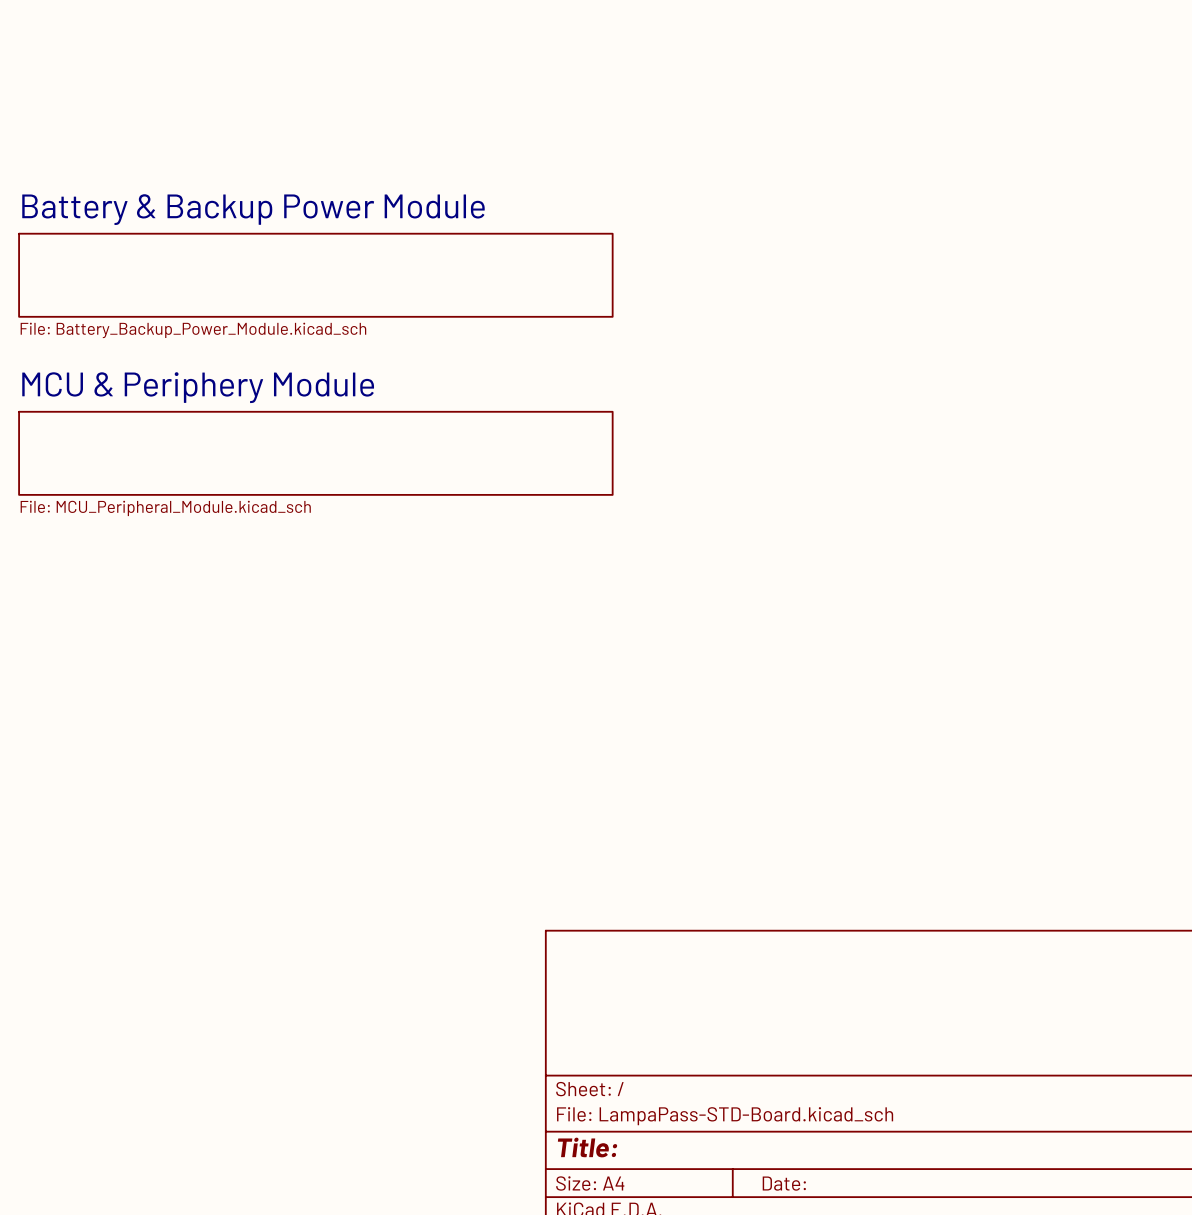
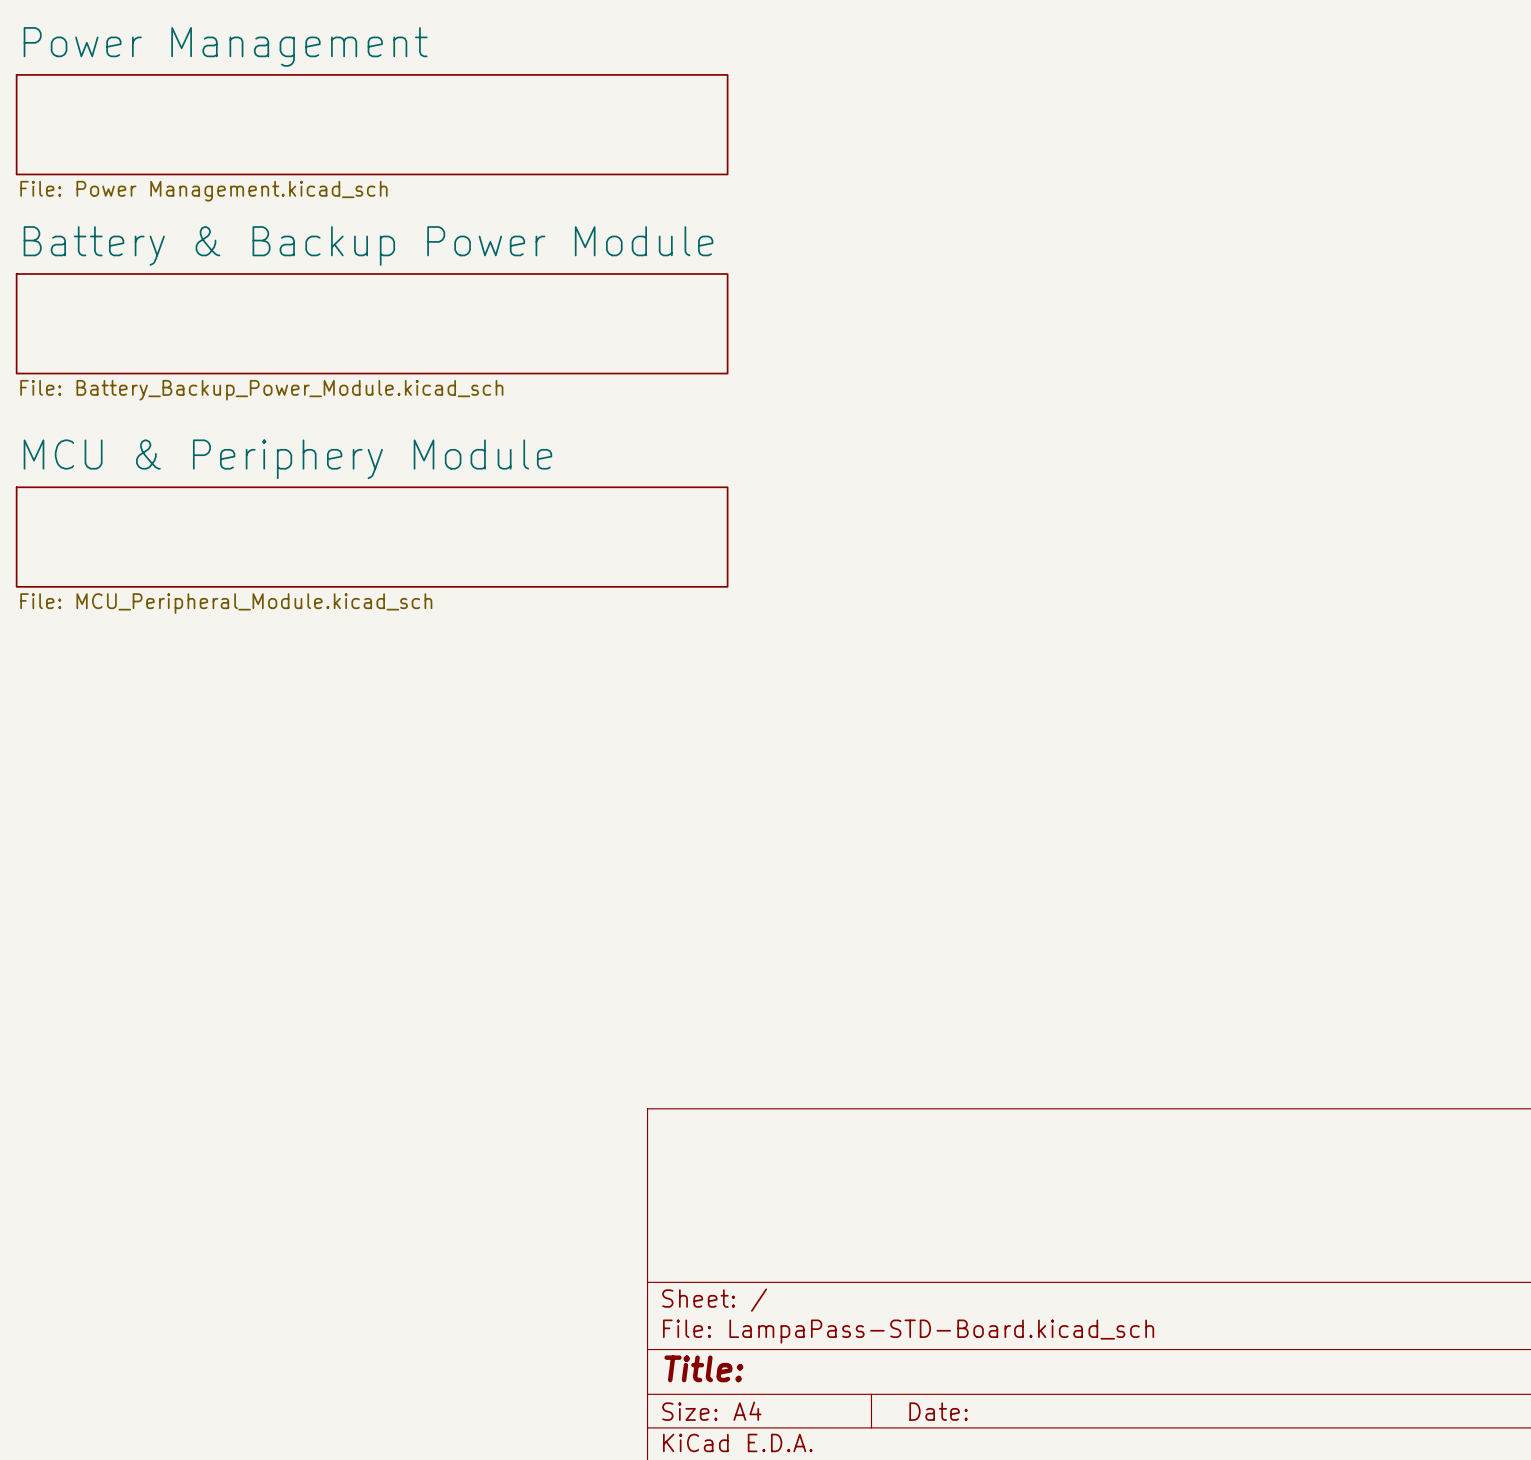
sheet Power Management: none -> File: Power Management.kicad_sch (372, 124)

